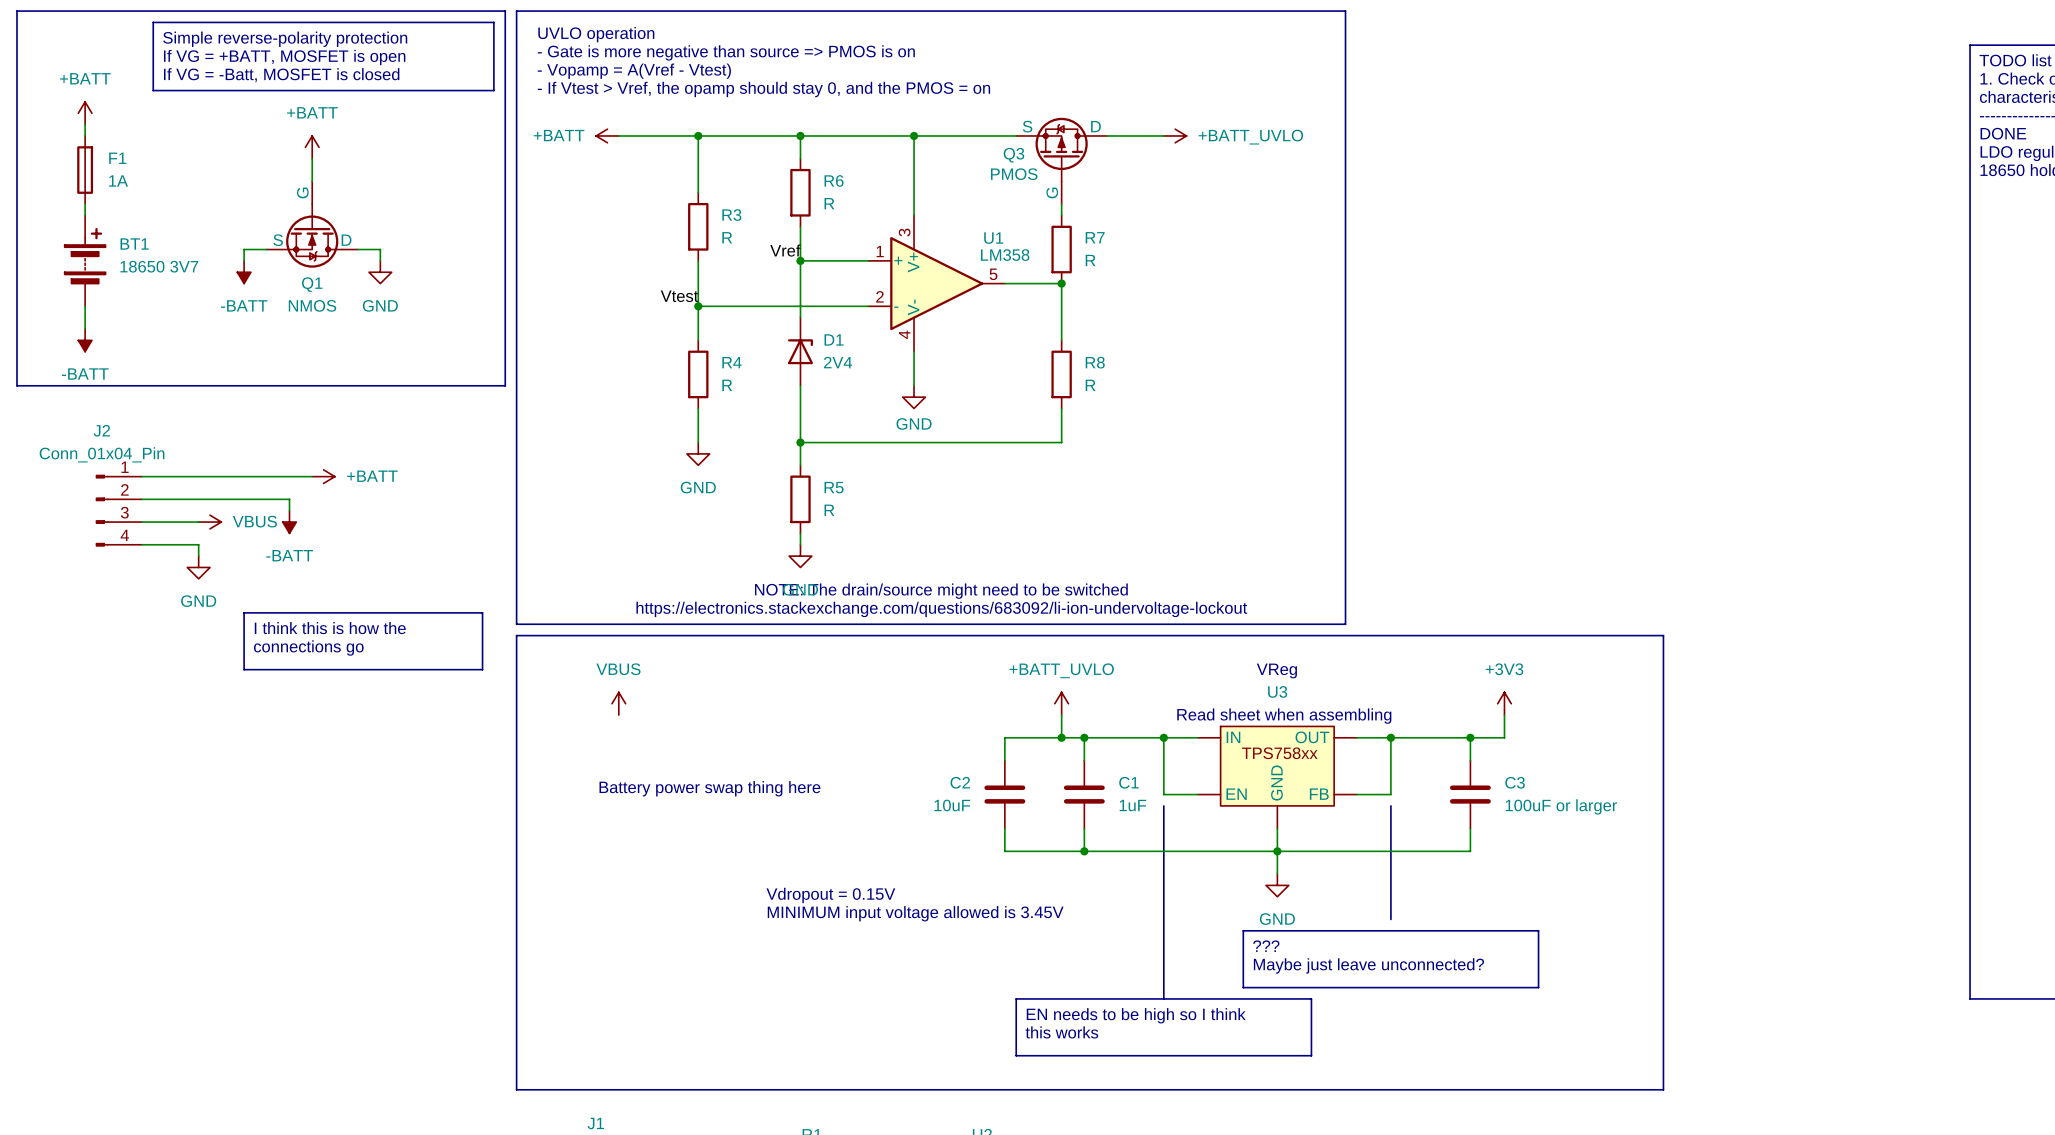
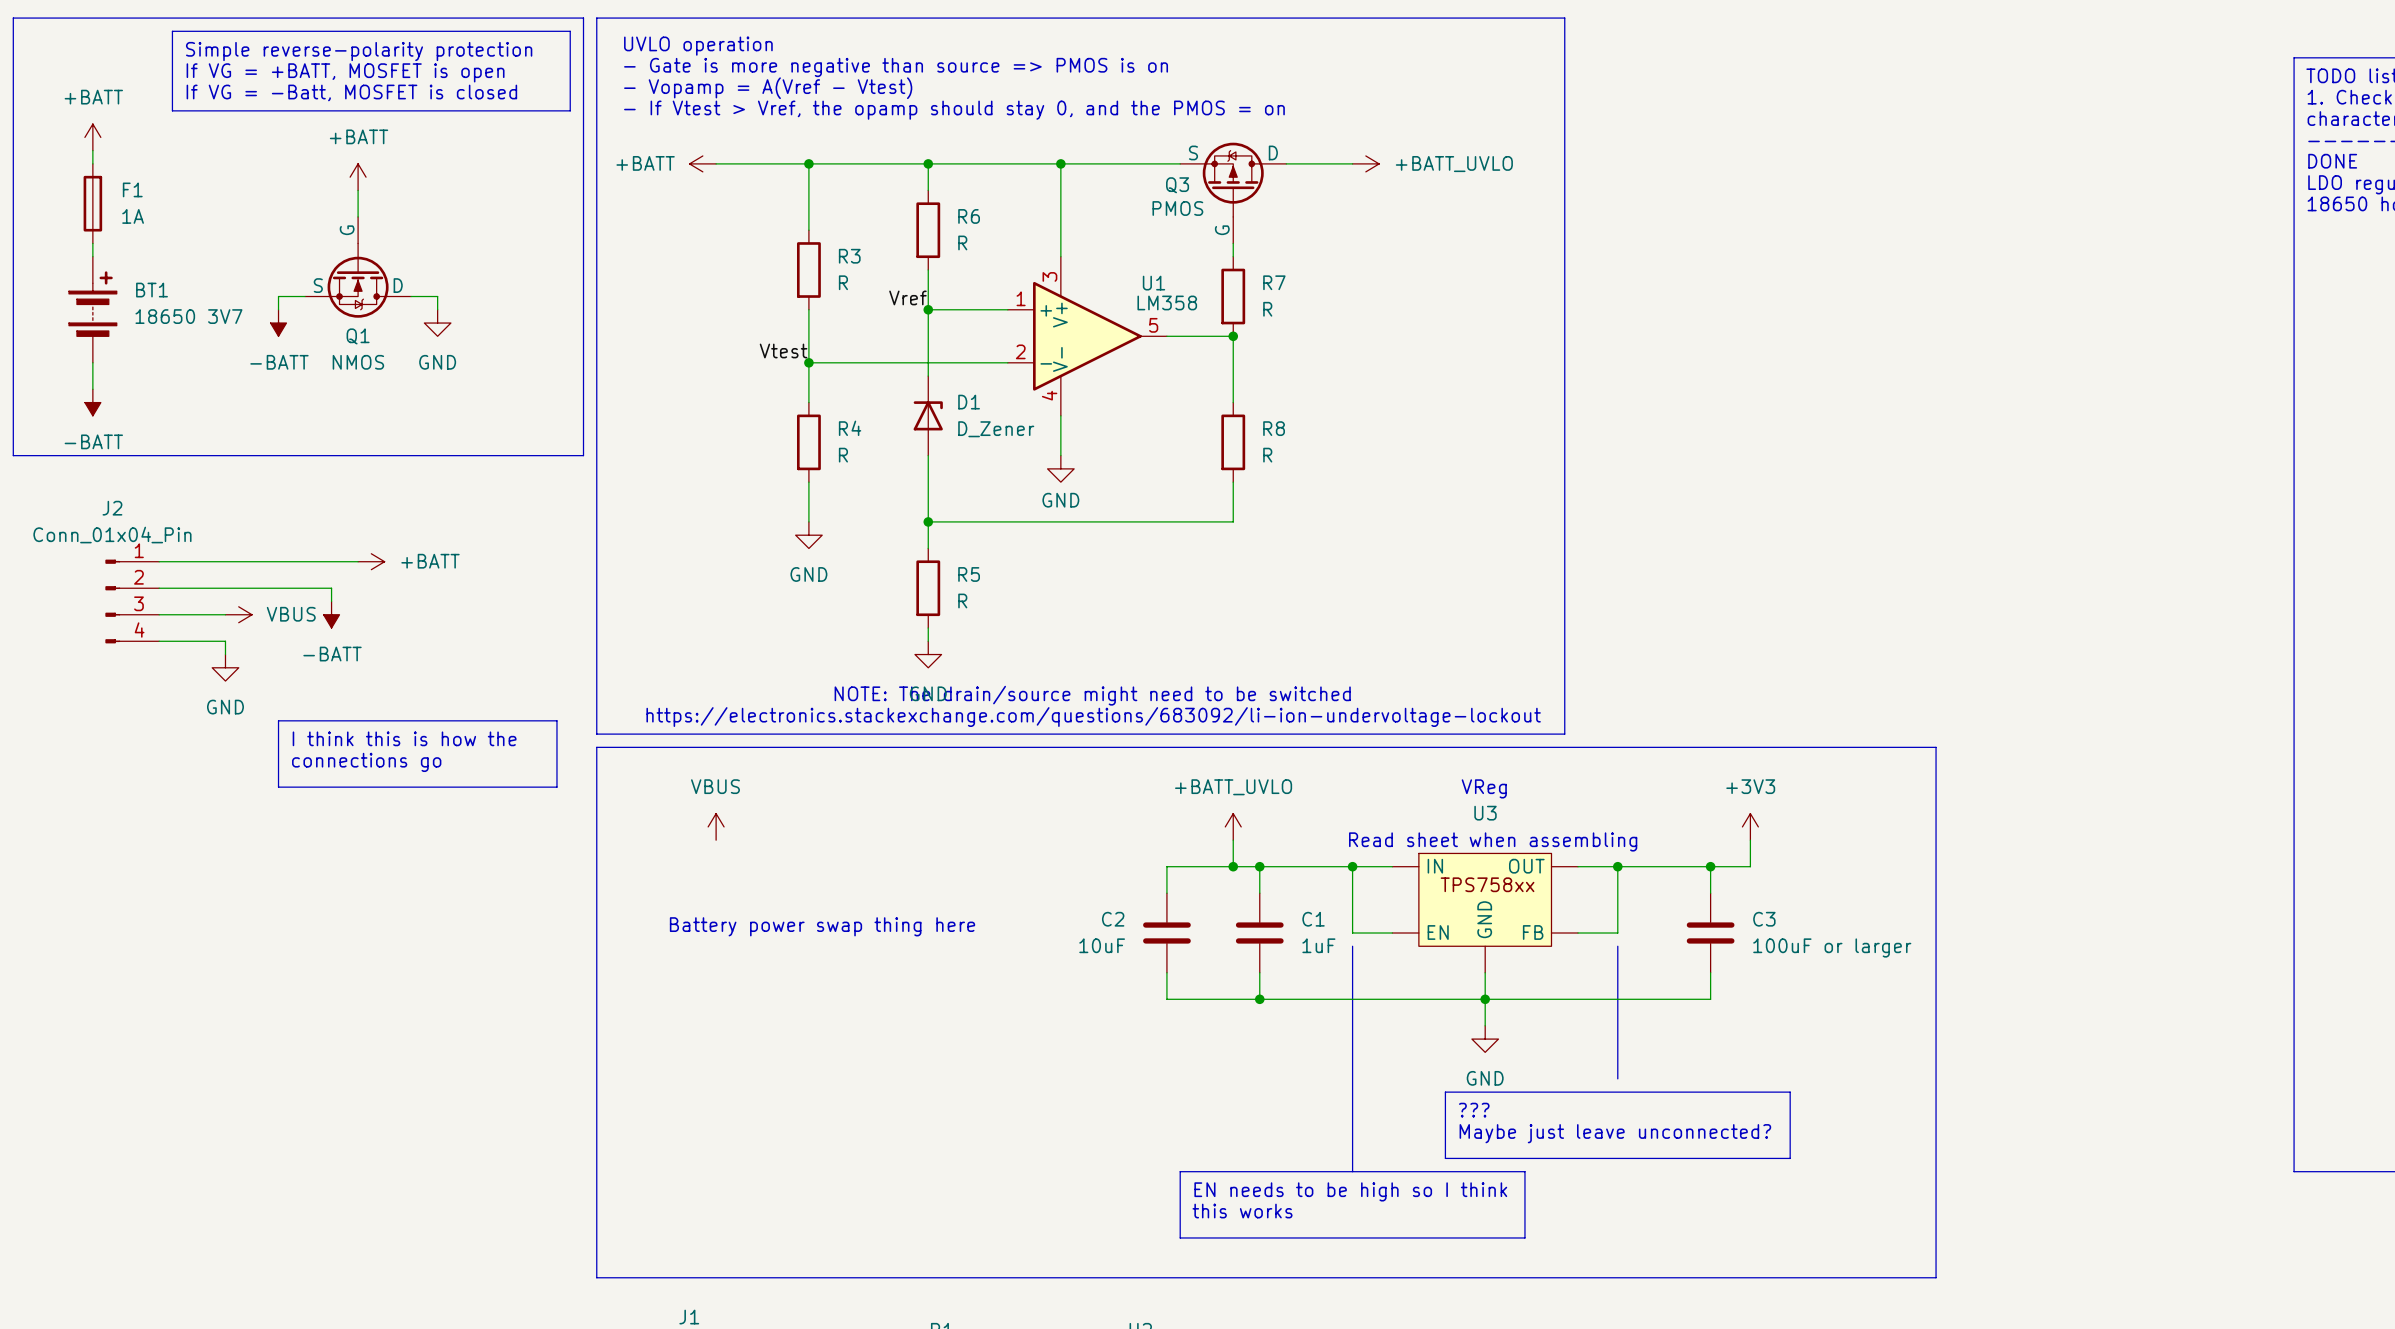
D1 value: 2V4 (838, 362) -> D_Zener (996, 429)
text: Vdropout = 0.15V (830, 895) -> none
text: MINIMUM input voltage allowed is 3.45V (915, 913) -> none

